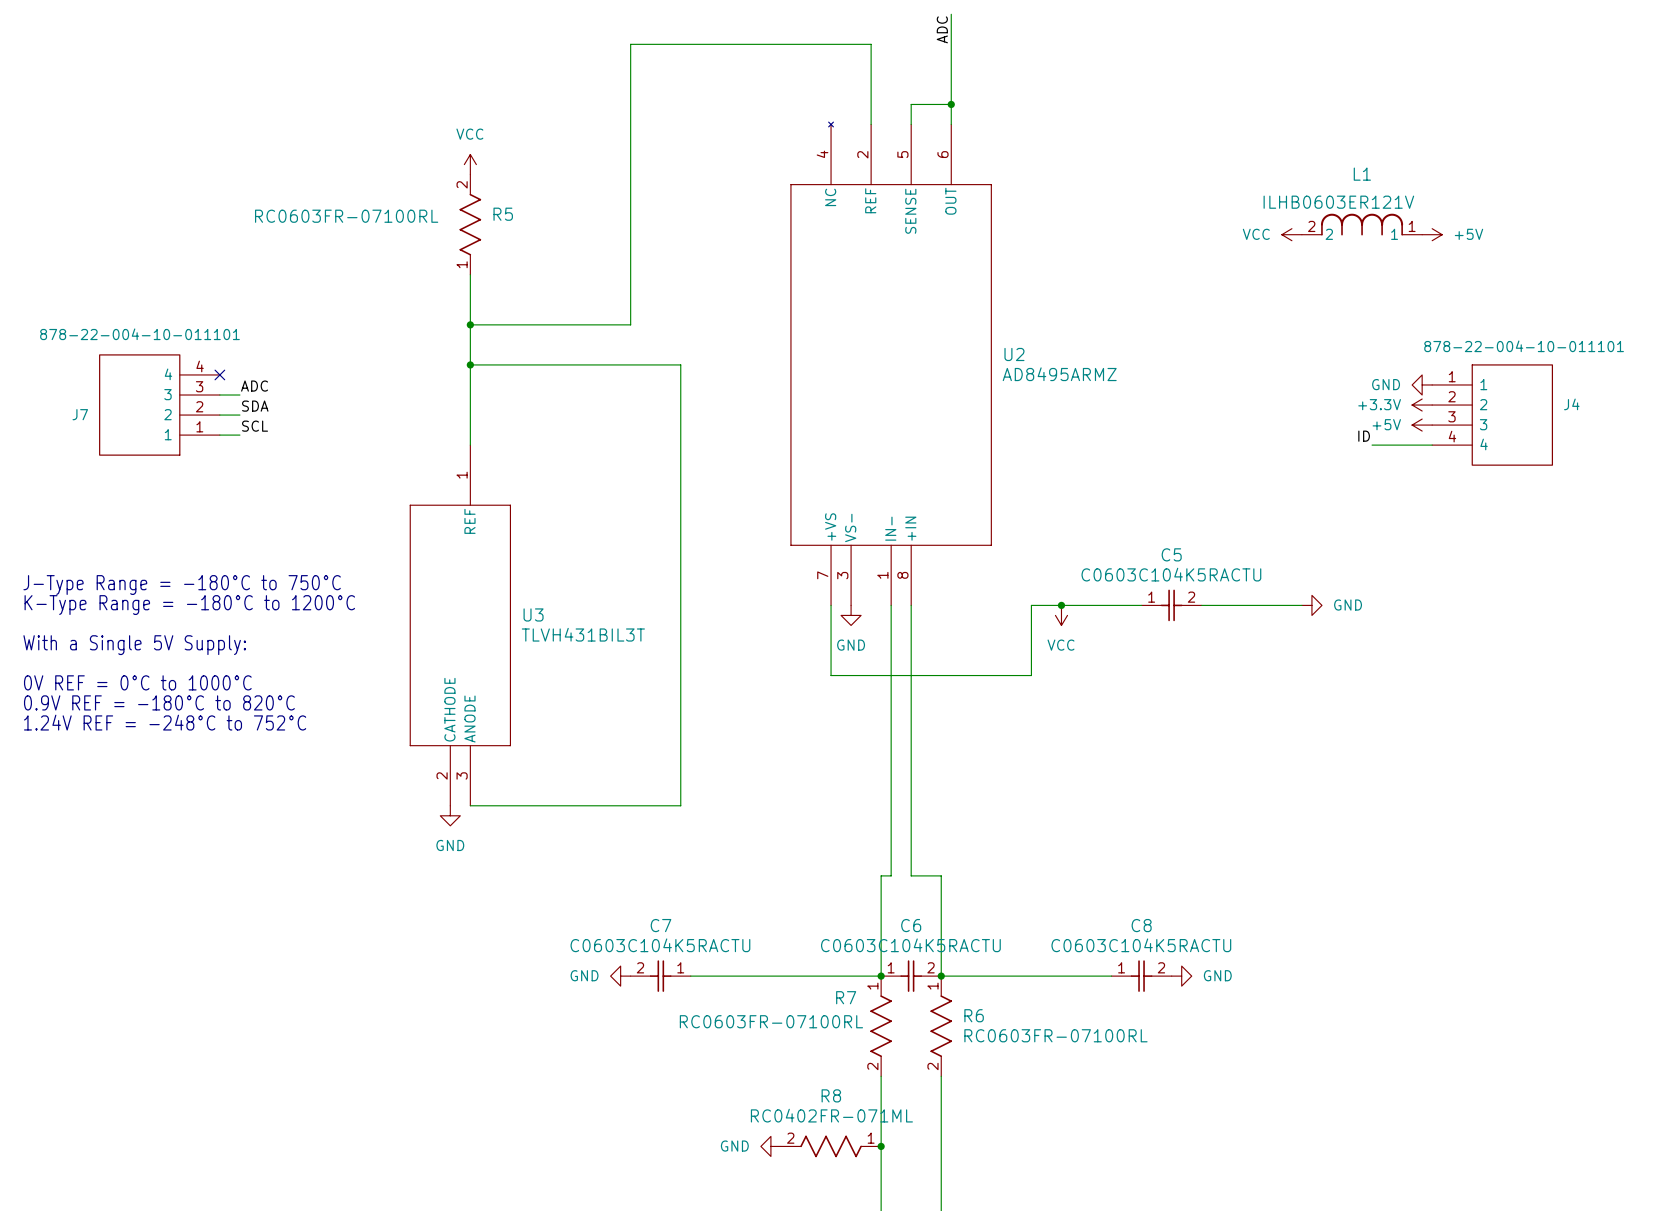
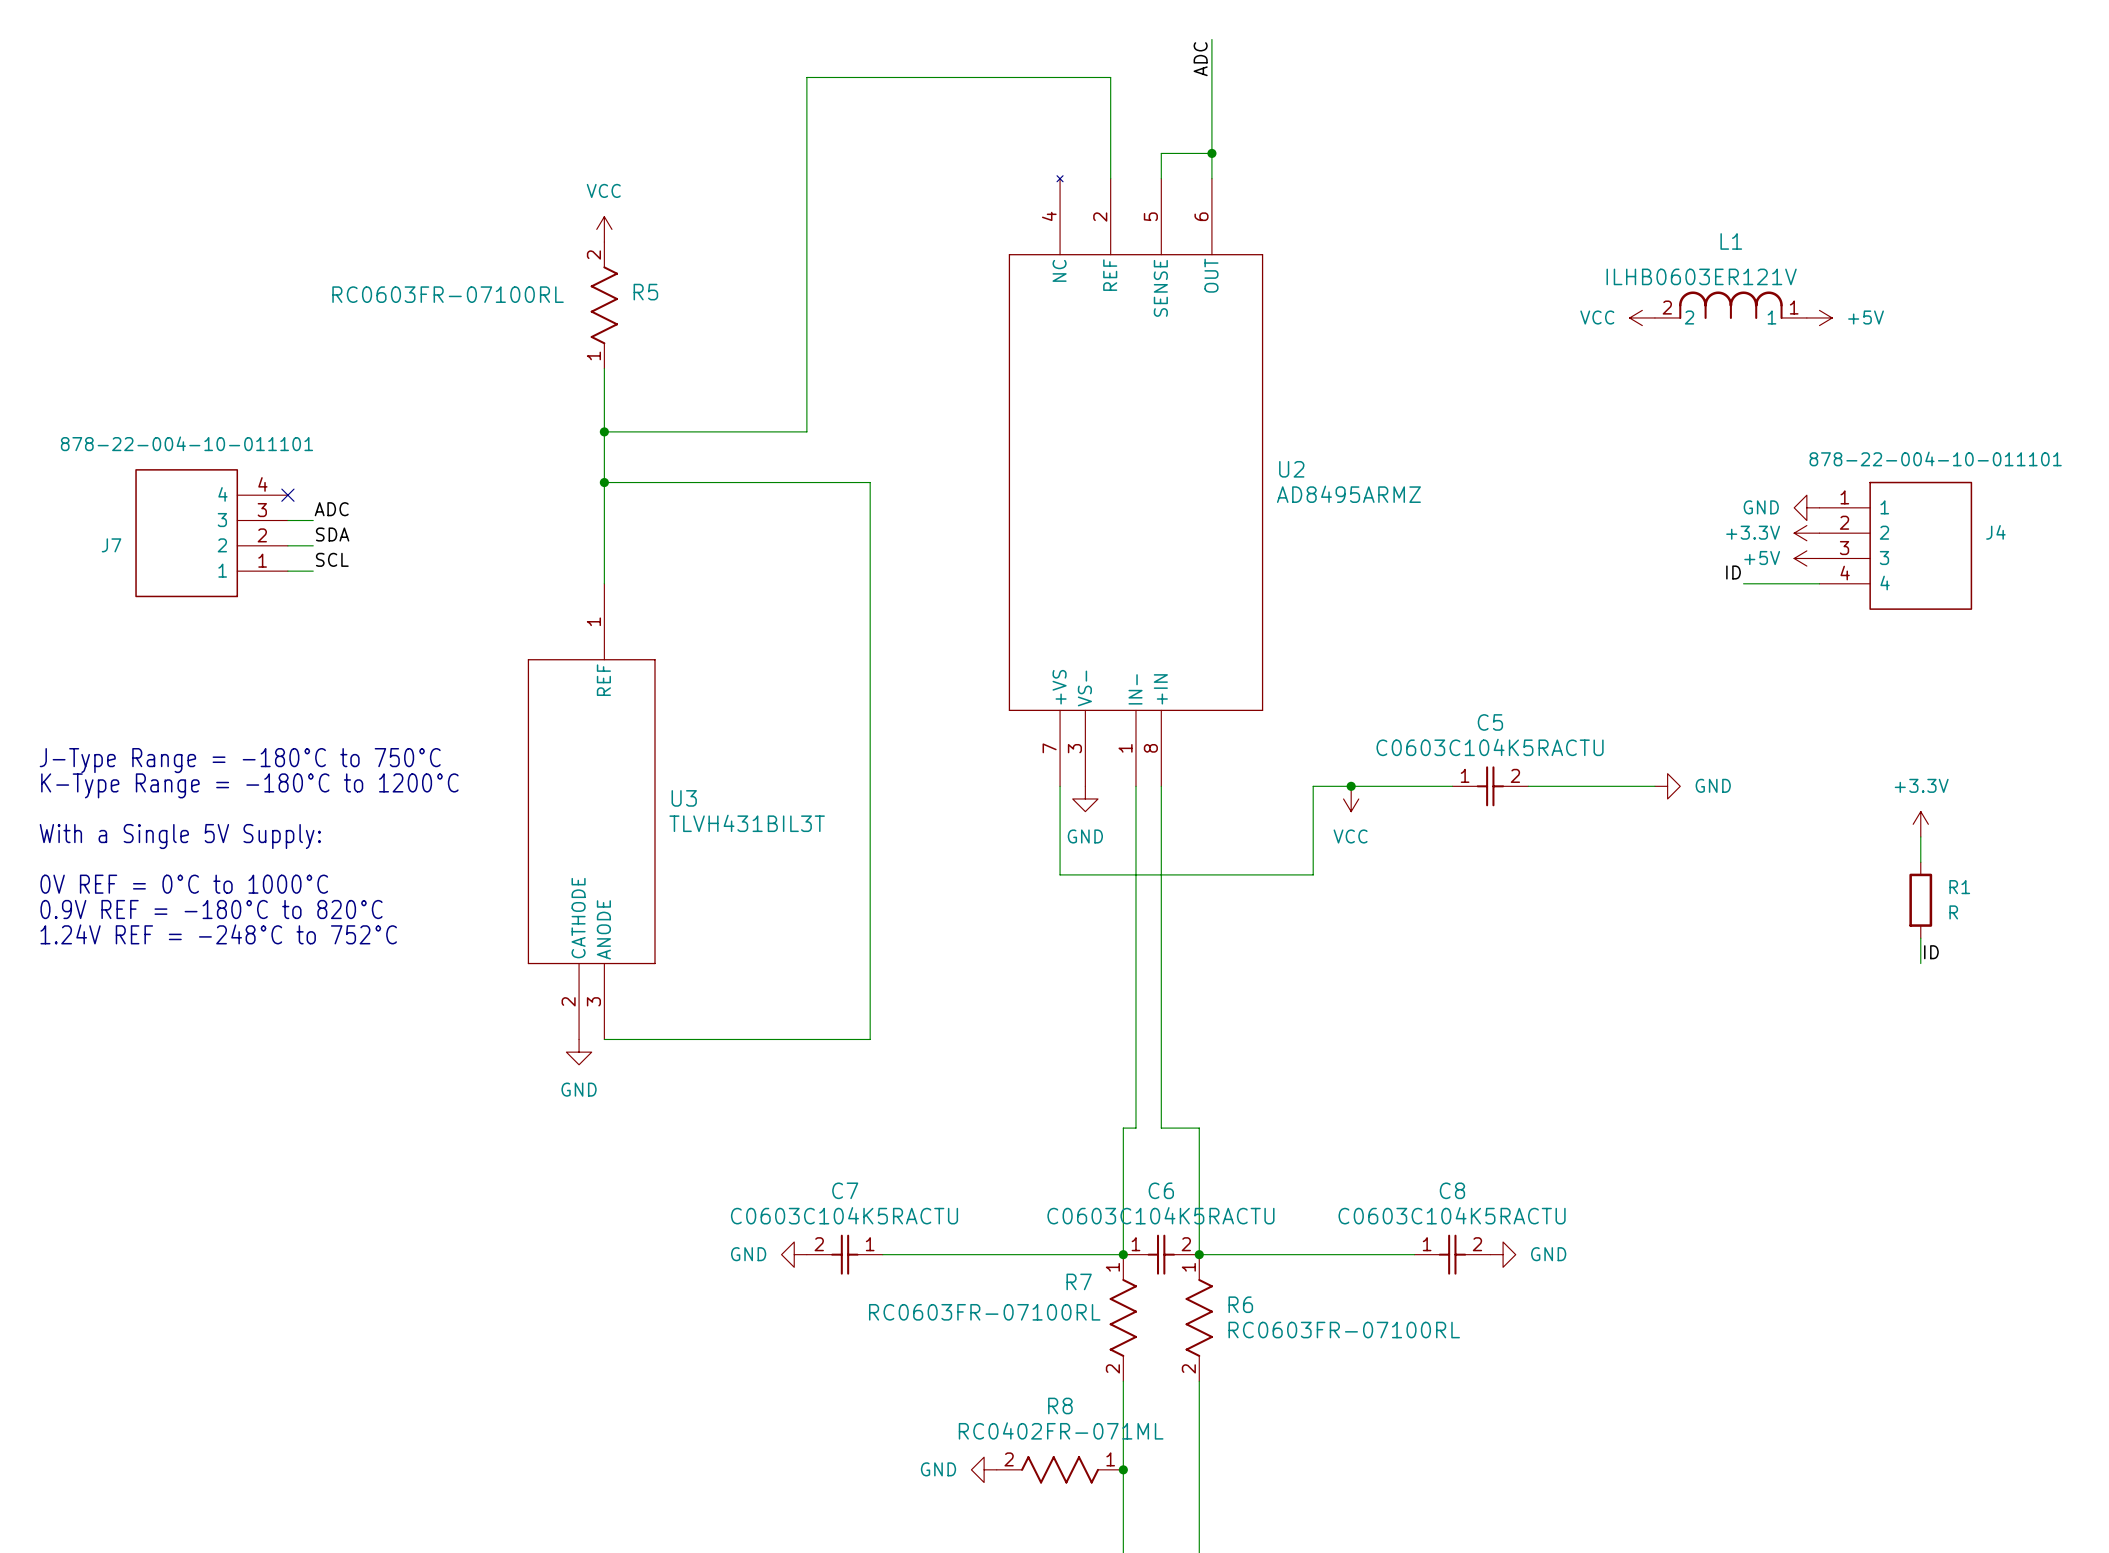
power symbol: none -> +3.3V (1920, 824)
wire: none -> (1920, 836) (1920, 862)
R1: none -> R (1920, 900)
wire: none -> (1920, 938) (1920, 963)
label: none -> ID (1931, 952)

